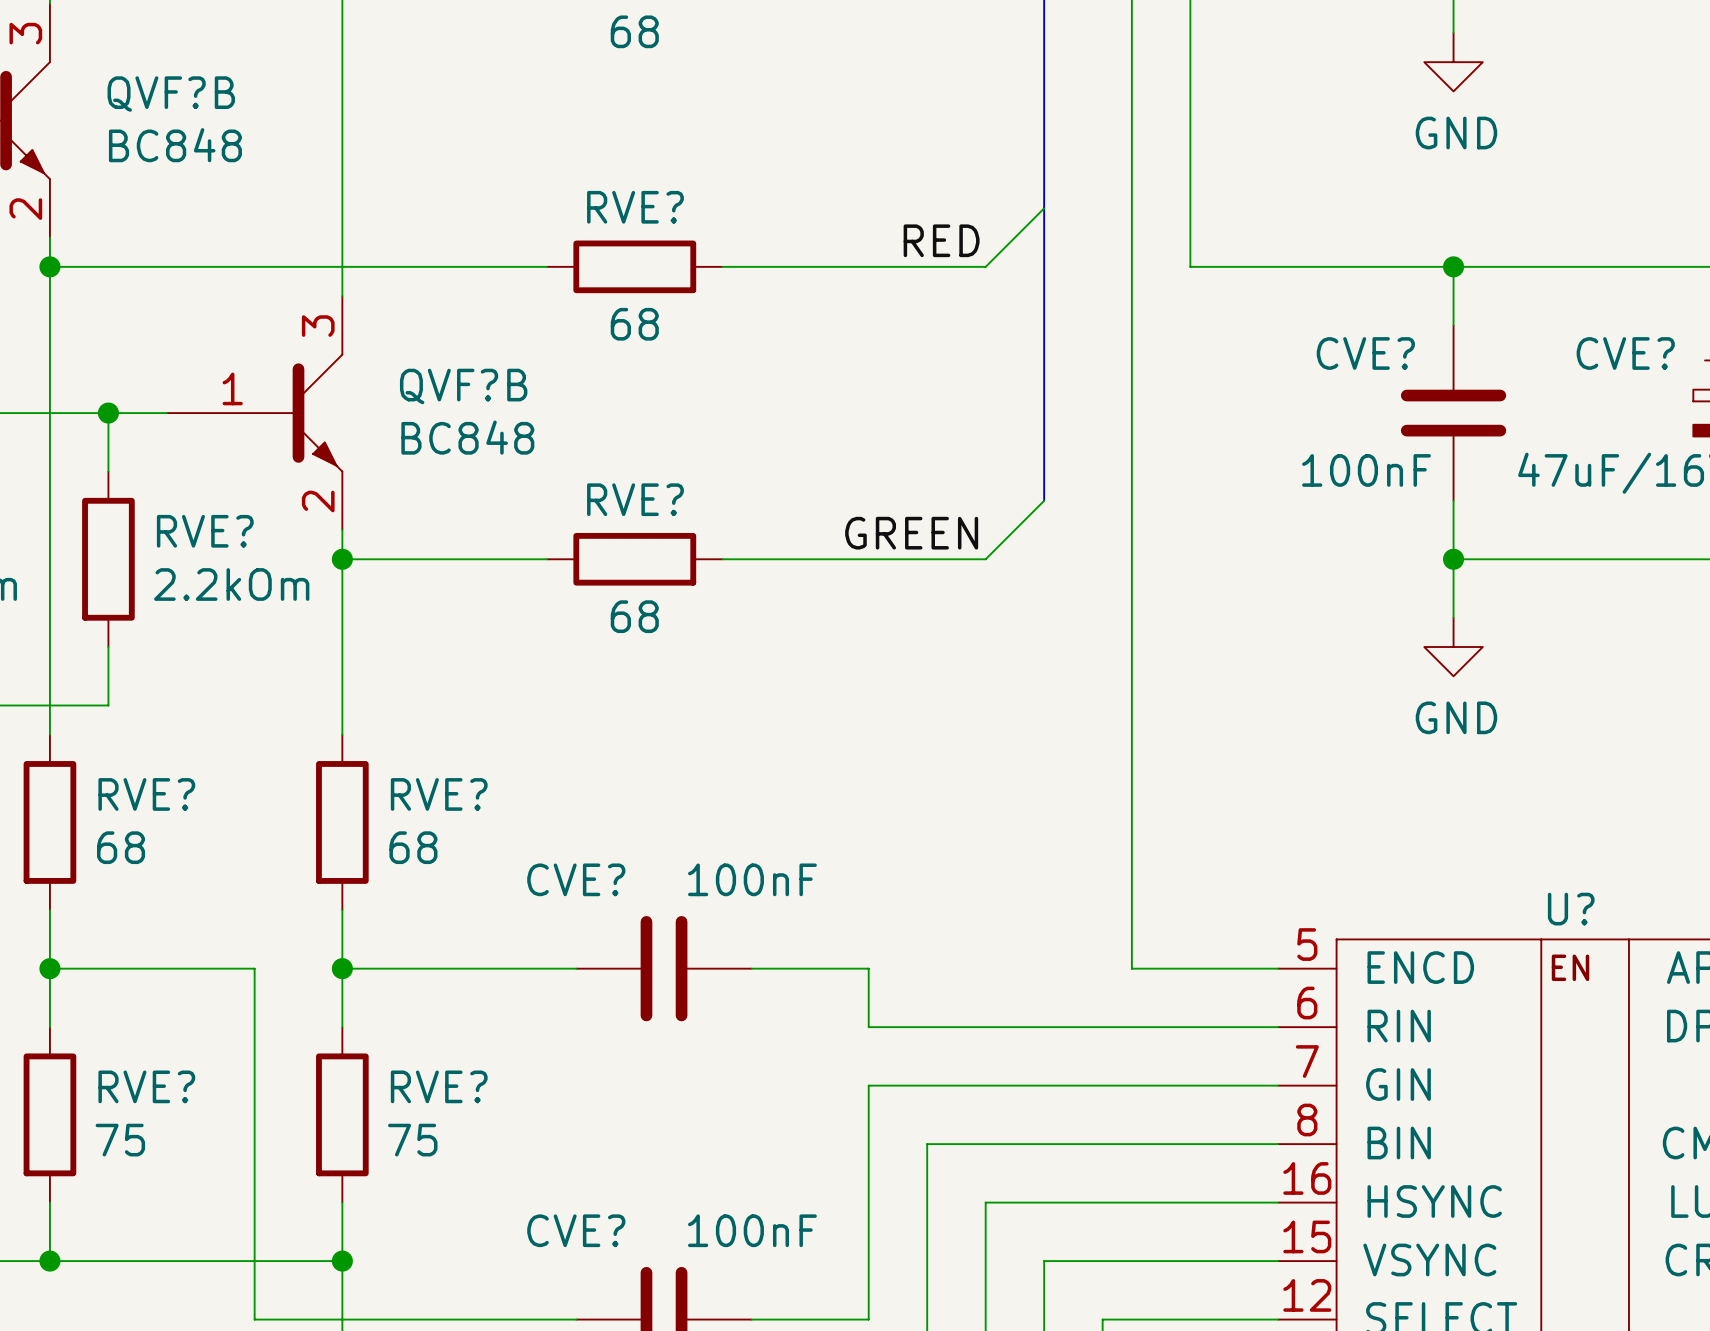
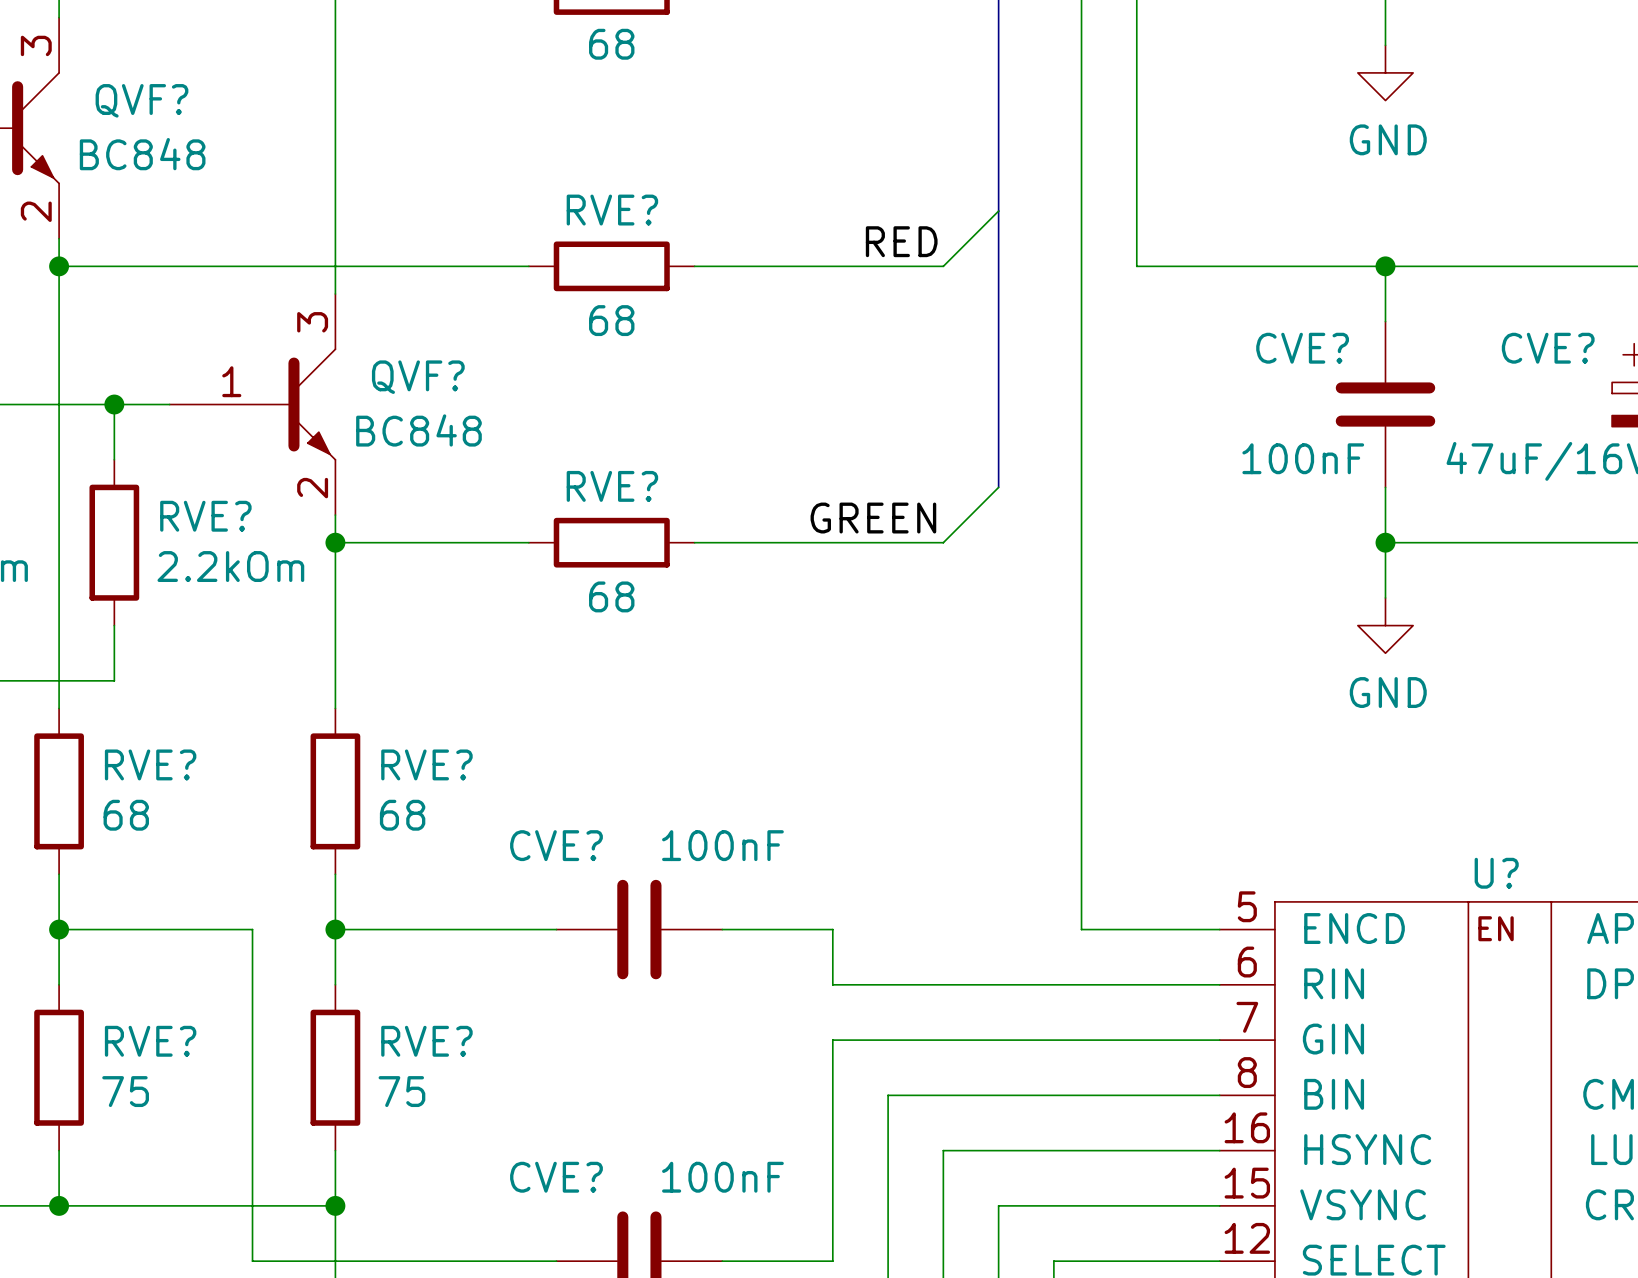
QVF?B name: QVF?B (171, 94) -> QVF? (141, 100)
QVF?B value position: BC848 (175, 145) -> BC848 (142, 154)
QVF?B name: QVF?B (463, 386) -> QVF? (418, 377)
QVF?B value position: BC848 (467, 437) -> BC848 (418, 430)

